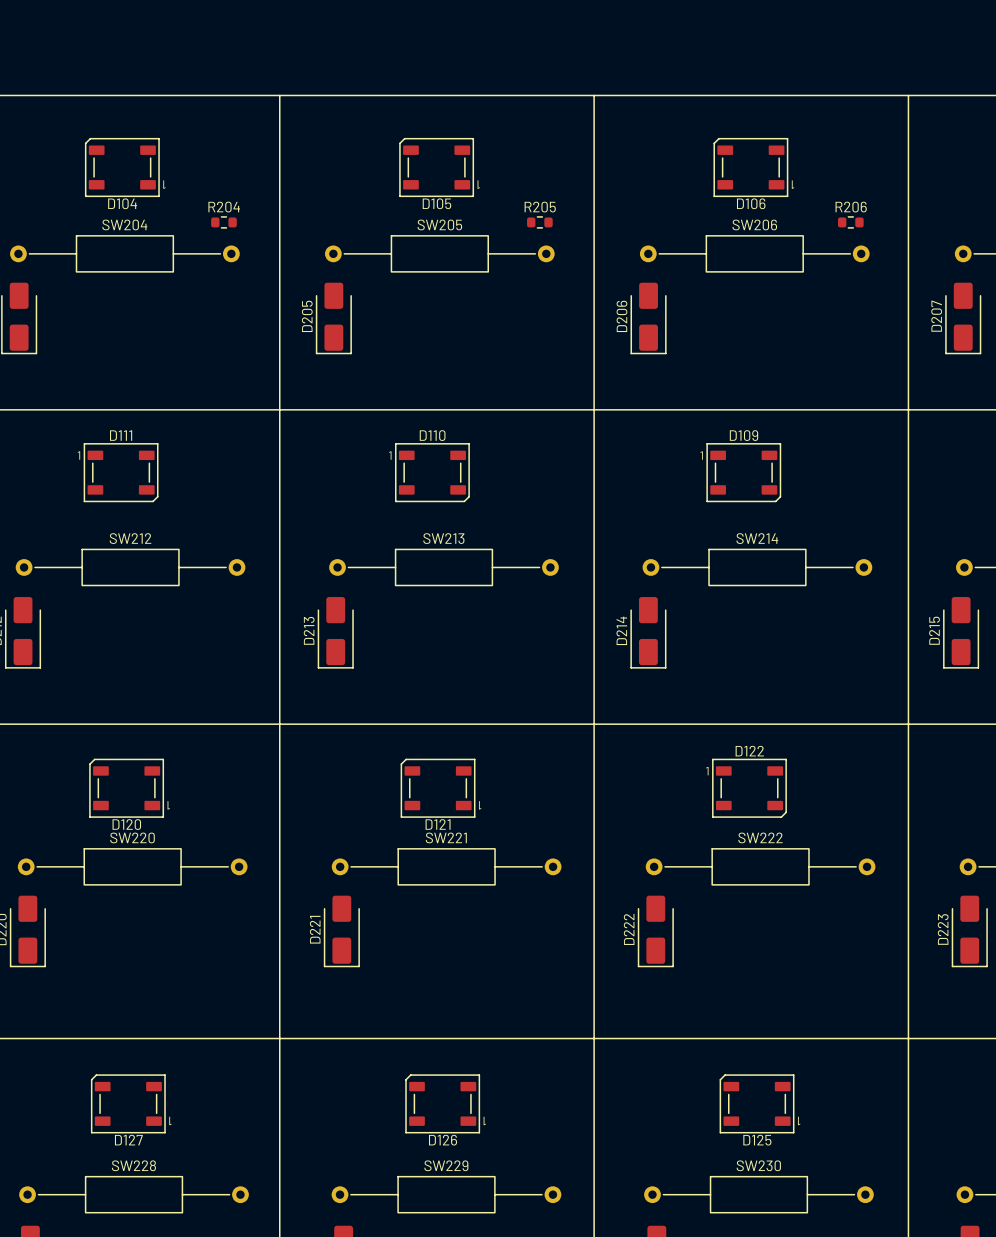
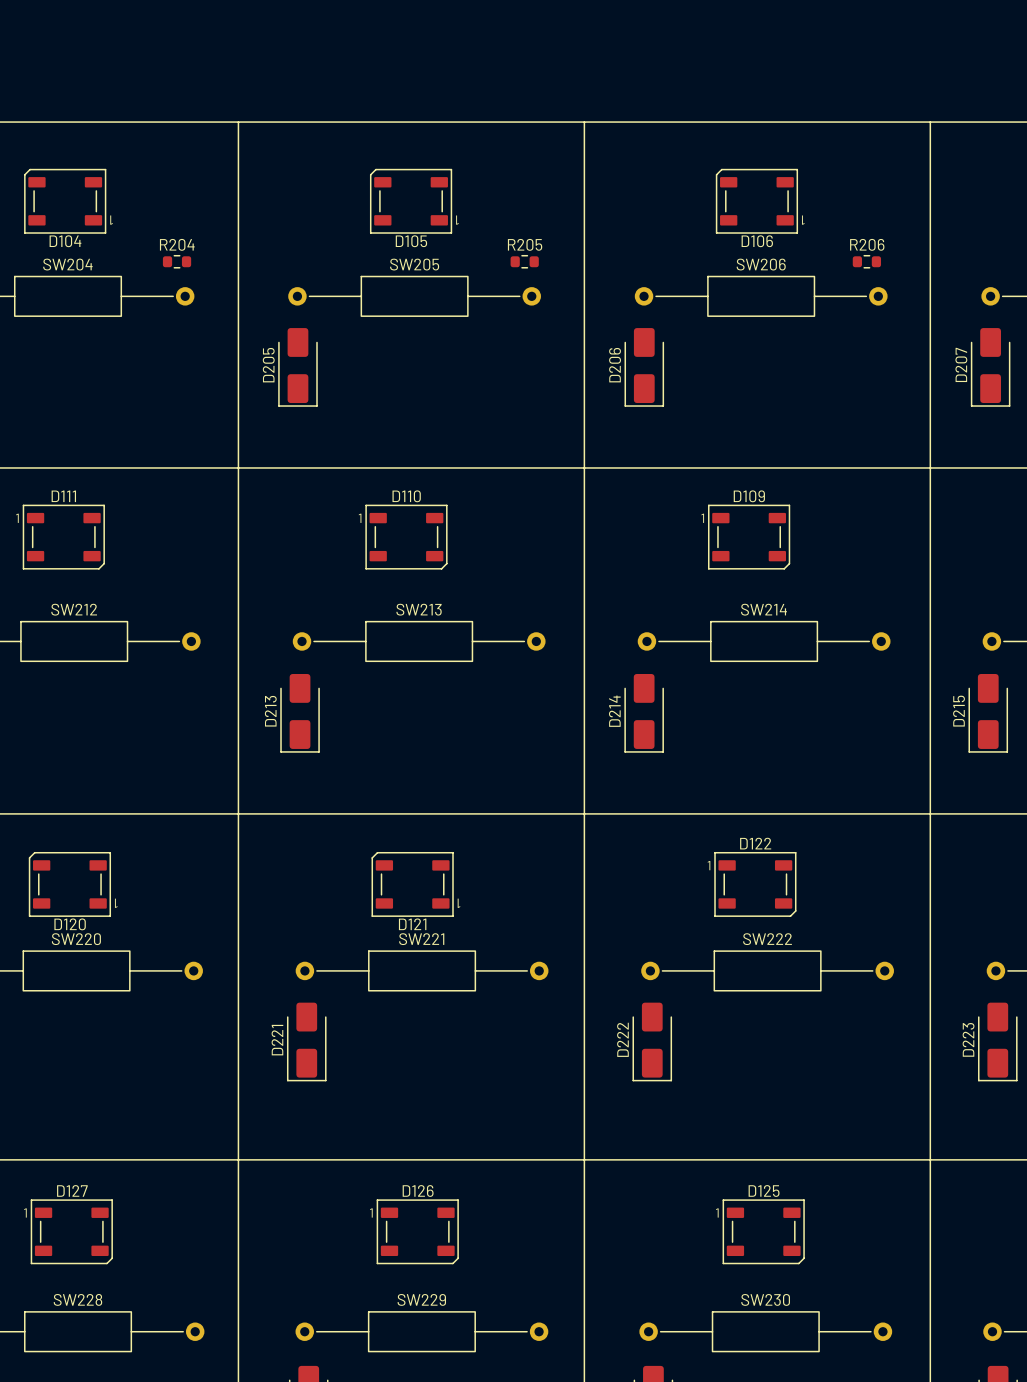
D127 rotation: 0° (128, 1103) -> 180° (71, 1231)
D126 rotation: 0° (442, 1103) -> 180° (417, 1231)
D125 rotation: 0° (757, 1103) -> 180° (763, 1231)

